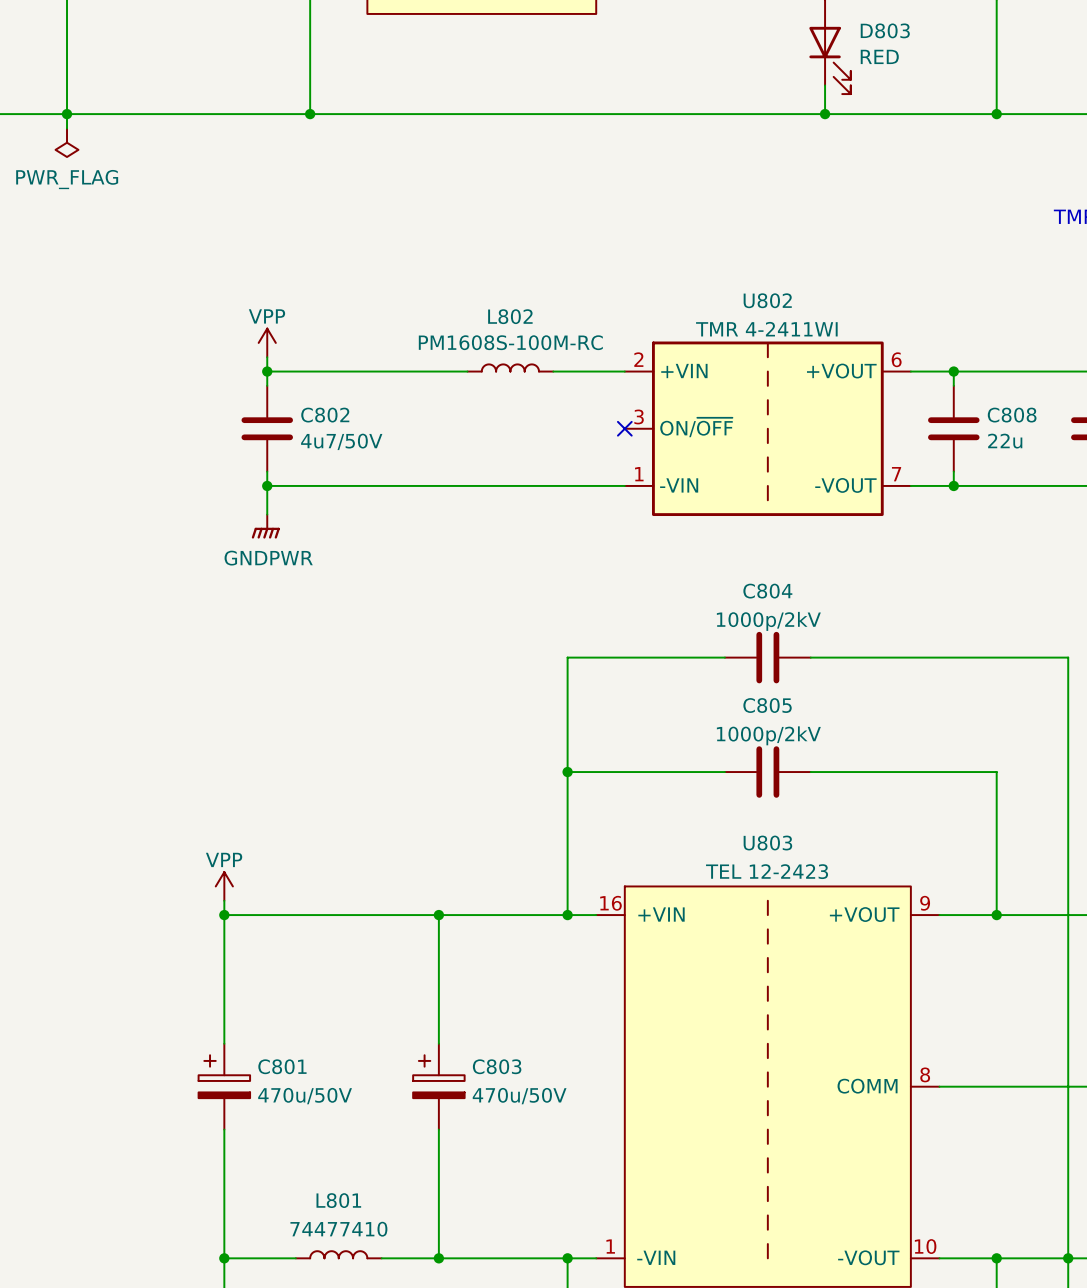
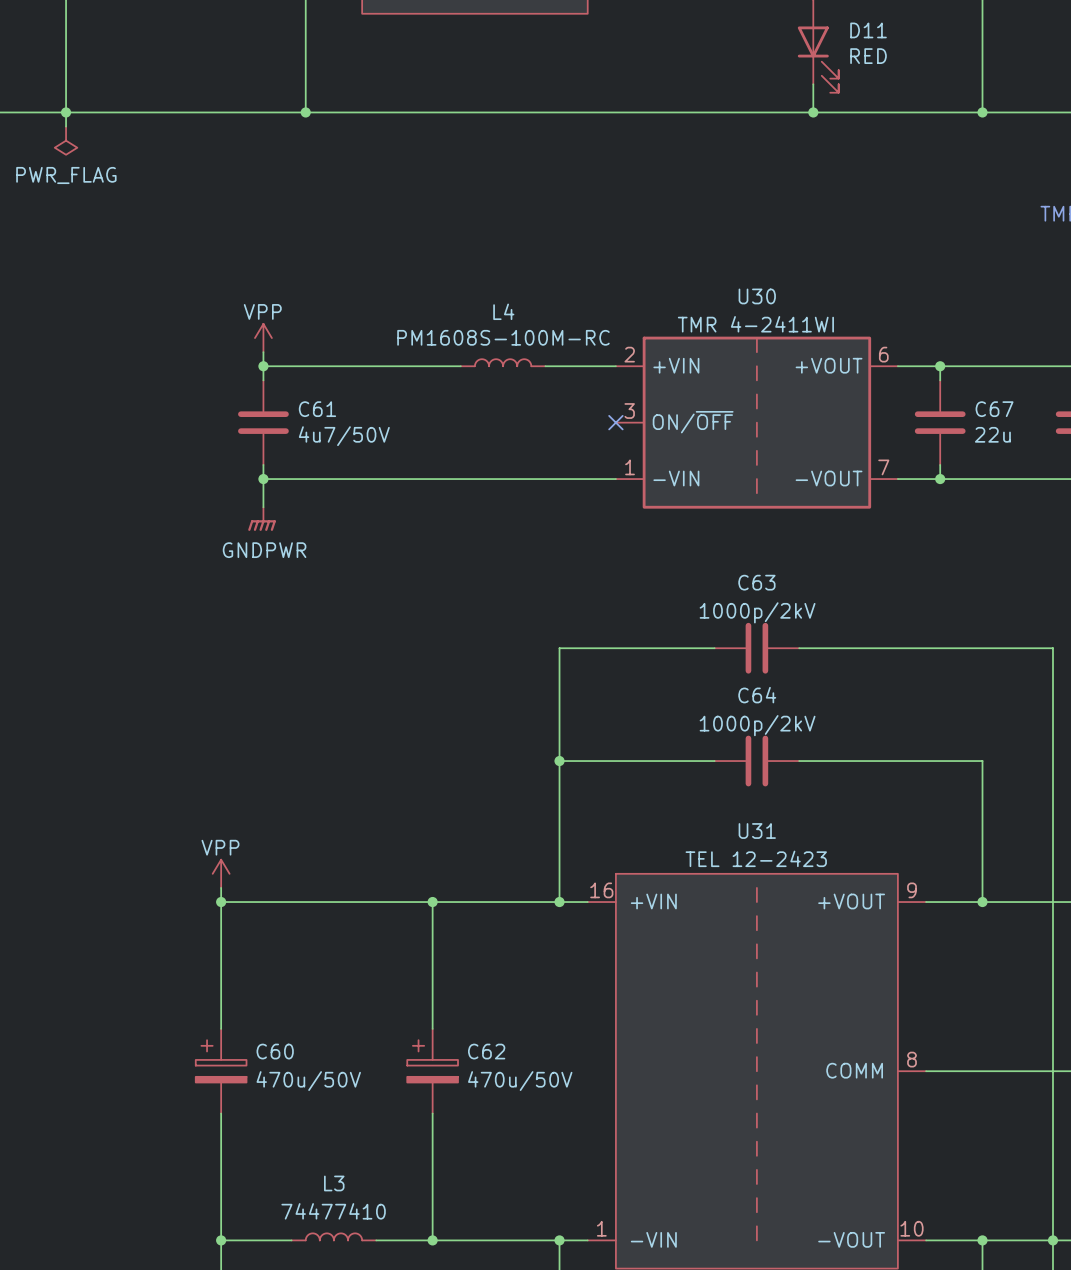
D803 name: D803 (885, 30) -> D11 (868, 30)
U802 name: U802 (767, 300) -> U30 (757, 296)
L802 name: L802 (510, 316) -> L4 (503, 311)
C802 name: C802 (325, 415) -> C61 (317, 409)
C808 name: C808 (1012, 415) -> C67 (994, 409)
C804 name: C804 (767, 591) -> C63 (756, 582)
C805 name: C805 (767, 705) -> C64 (757, 695)
U803 name: U803 (767, 843) -> U31 (757, 831)
C801 name: C801 (282, 1066) -> C60 (275, 1051)
C803 name: C803 (497, 1066) -> C62 (486, 1051)
L801 name: L801 (338, 1200) -> L3 (334, 1183)

